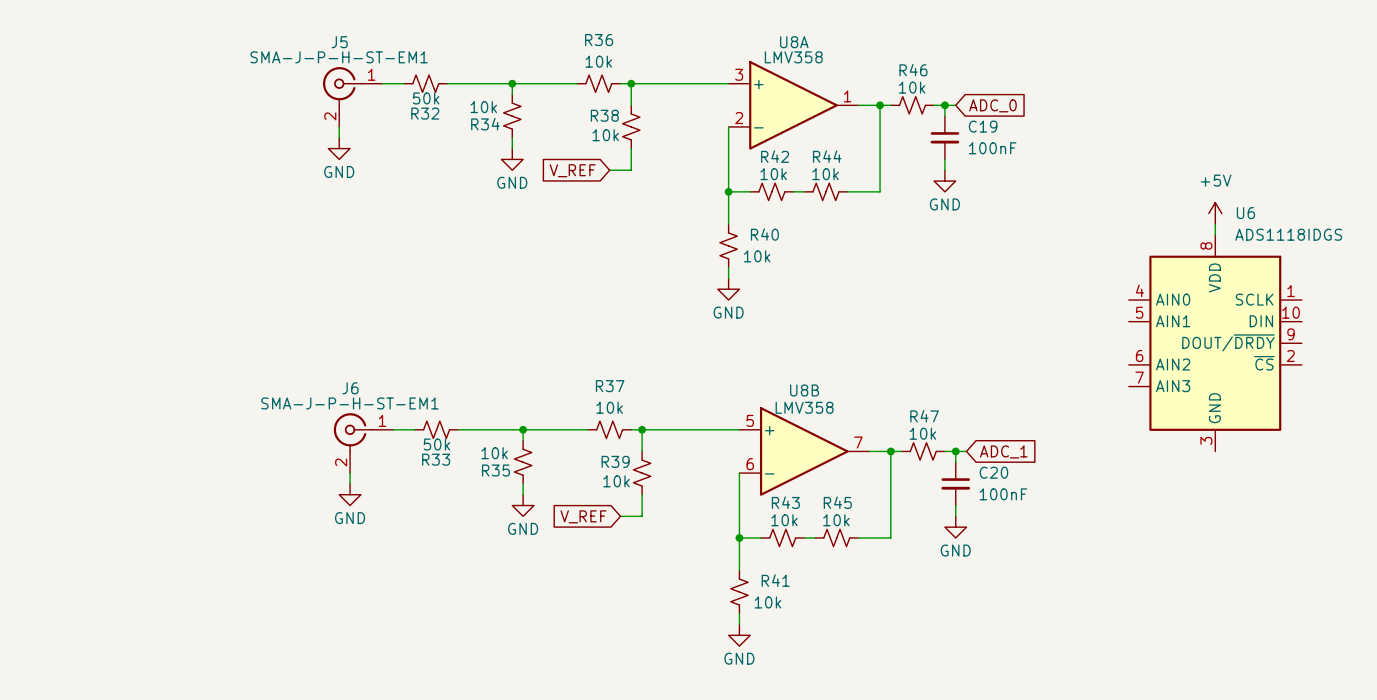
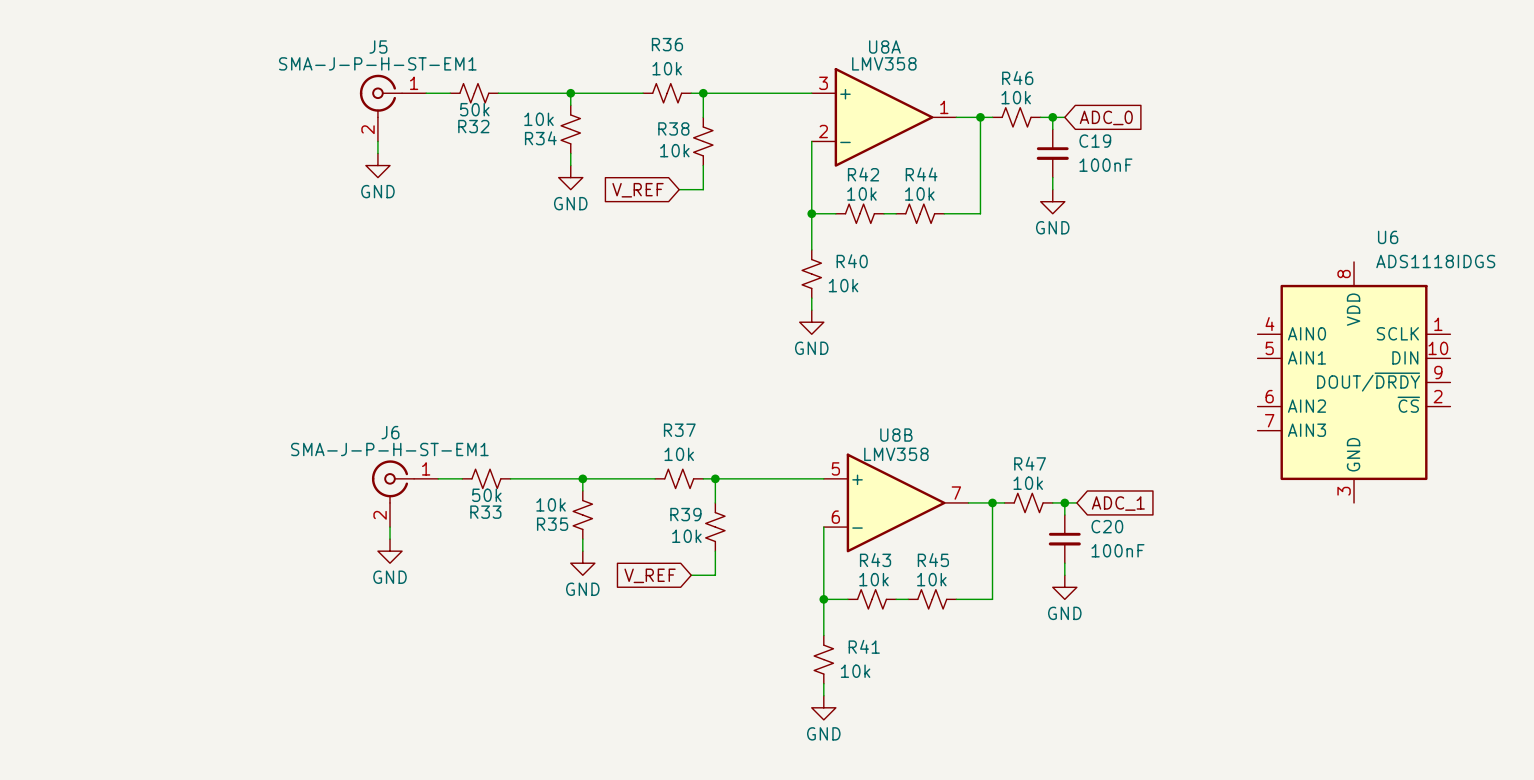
power symbol: +5V (1215, 213) -> none
wire: (1215, 224) (1215, 235) -> none

